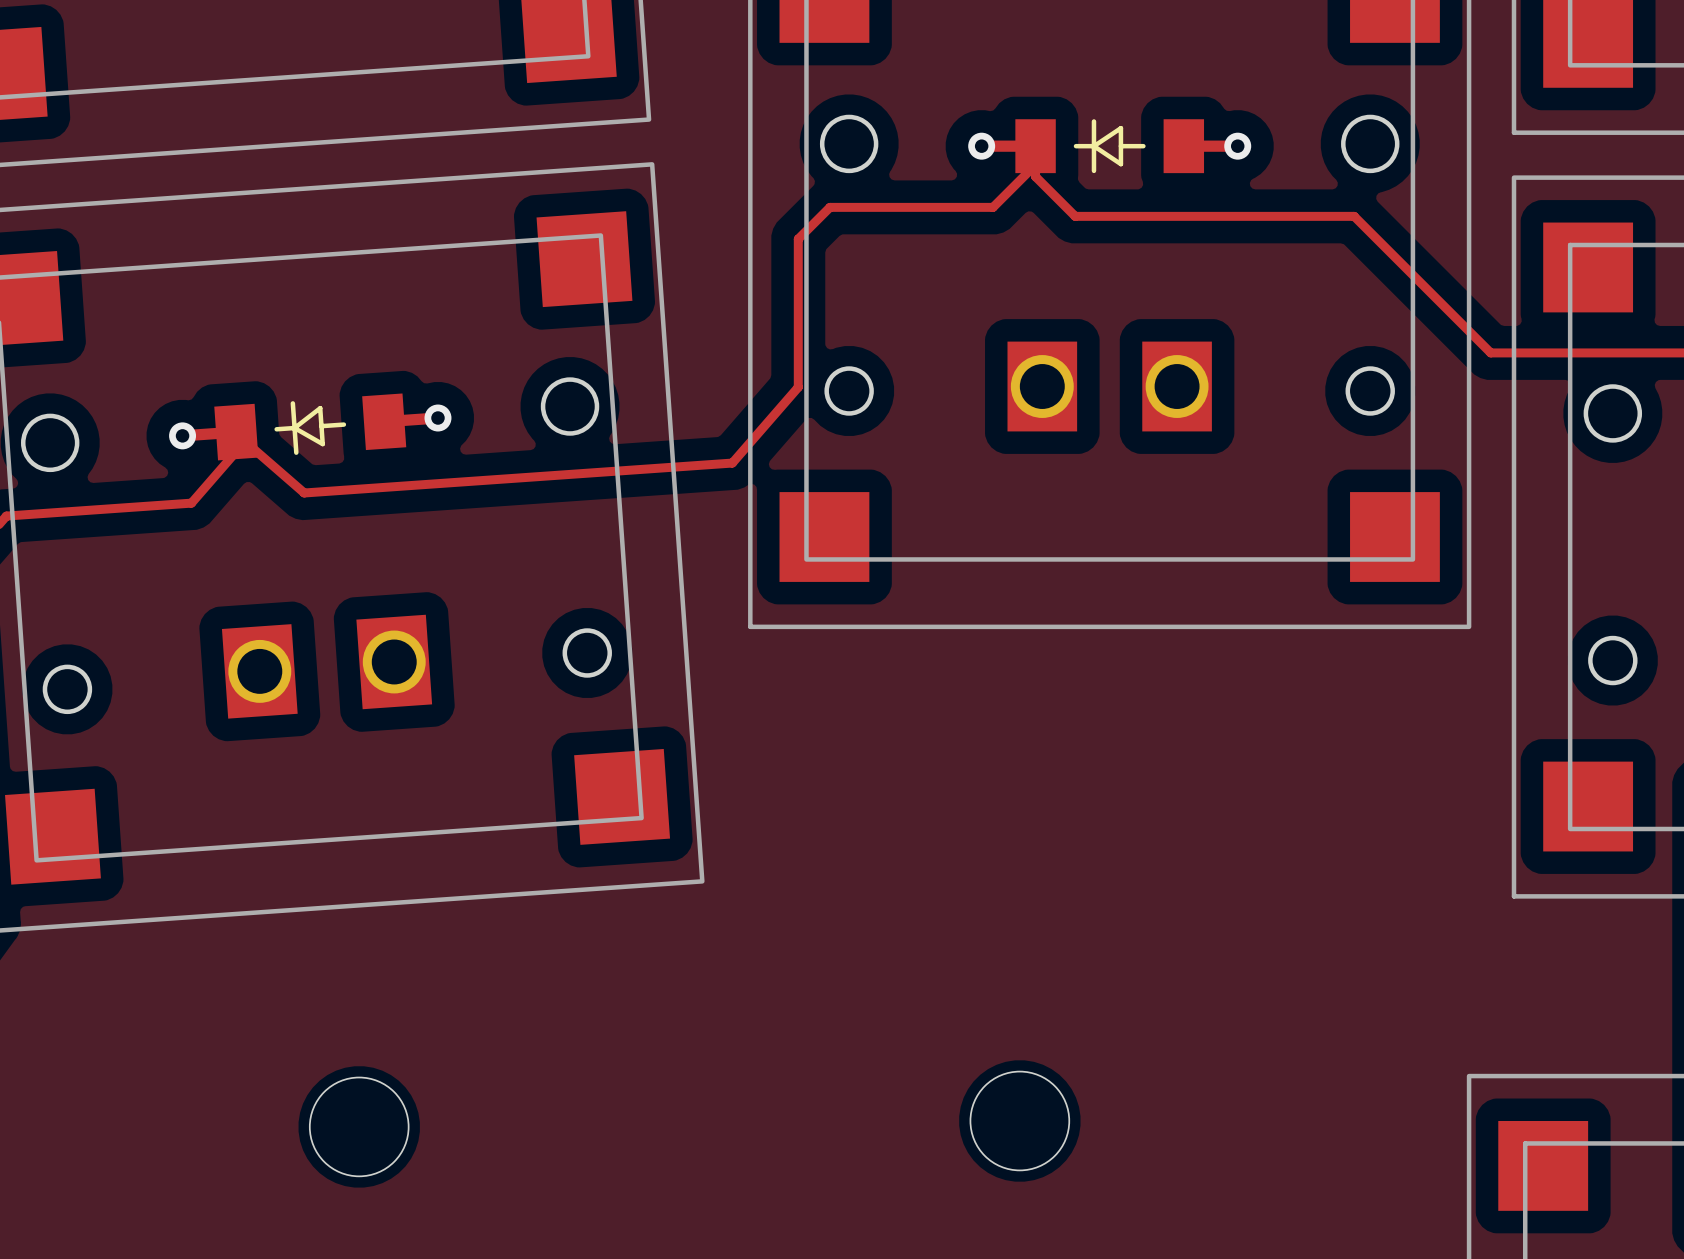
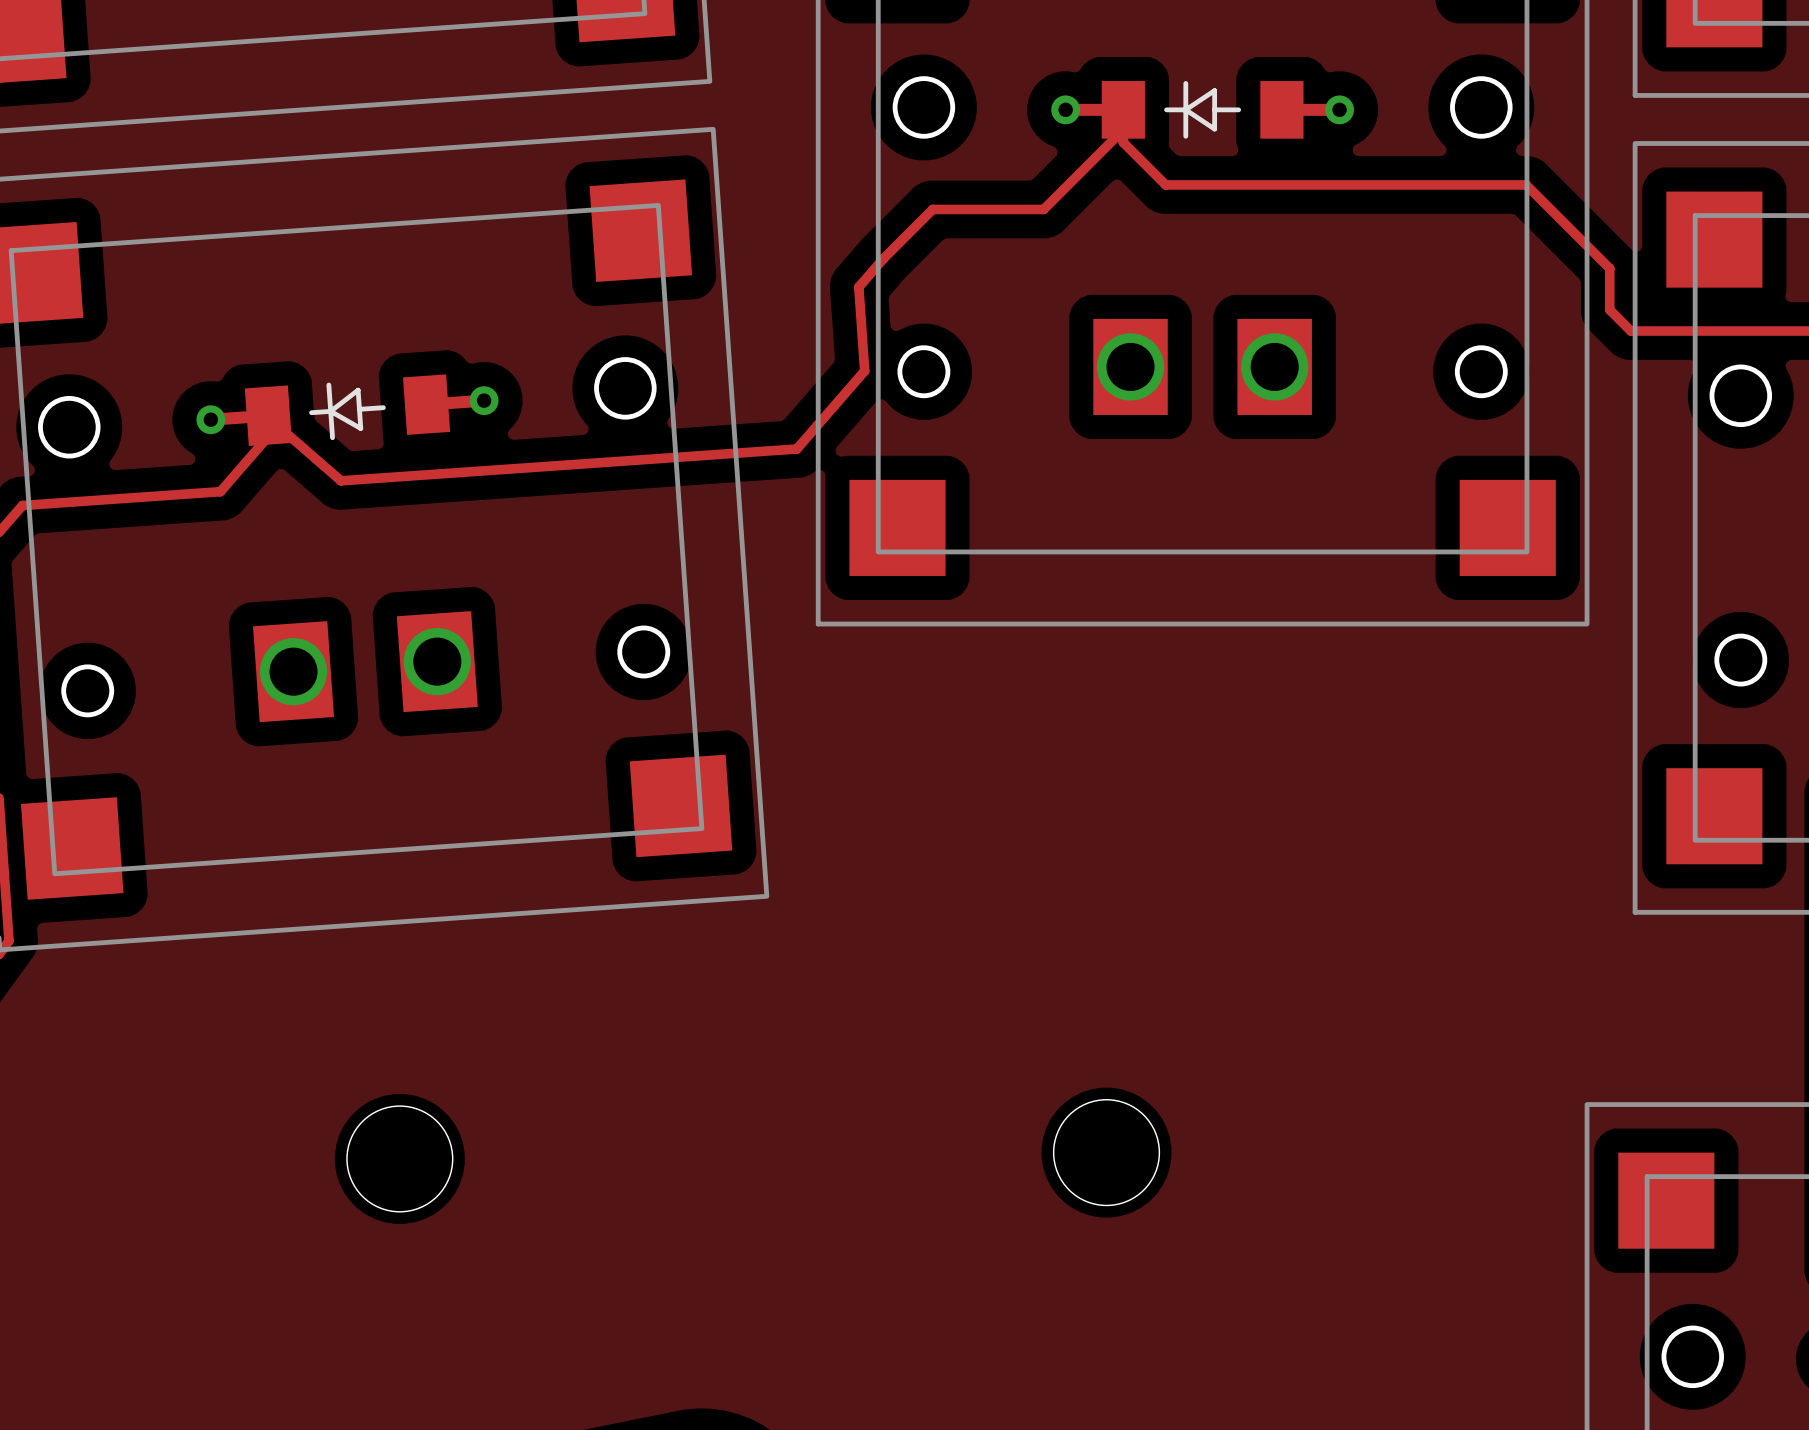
track: (993, 207) (829, 207) (798, 239) (798, 387) (730, 463) -> (1077, 175) (1043, 209) (932, 209) (883, 258) (858, 287) (864, 371) (796, 448)
track: (1354, 216) (1490, 352) (1510, 352) -> (1464, 184) (1526, 184) (1609, 268) (1609, 309) (1630, 331)

